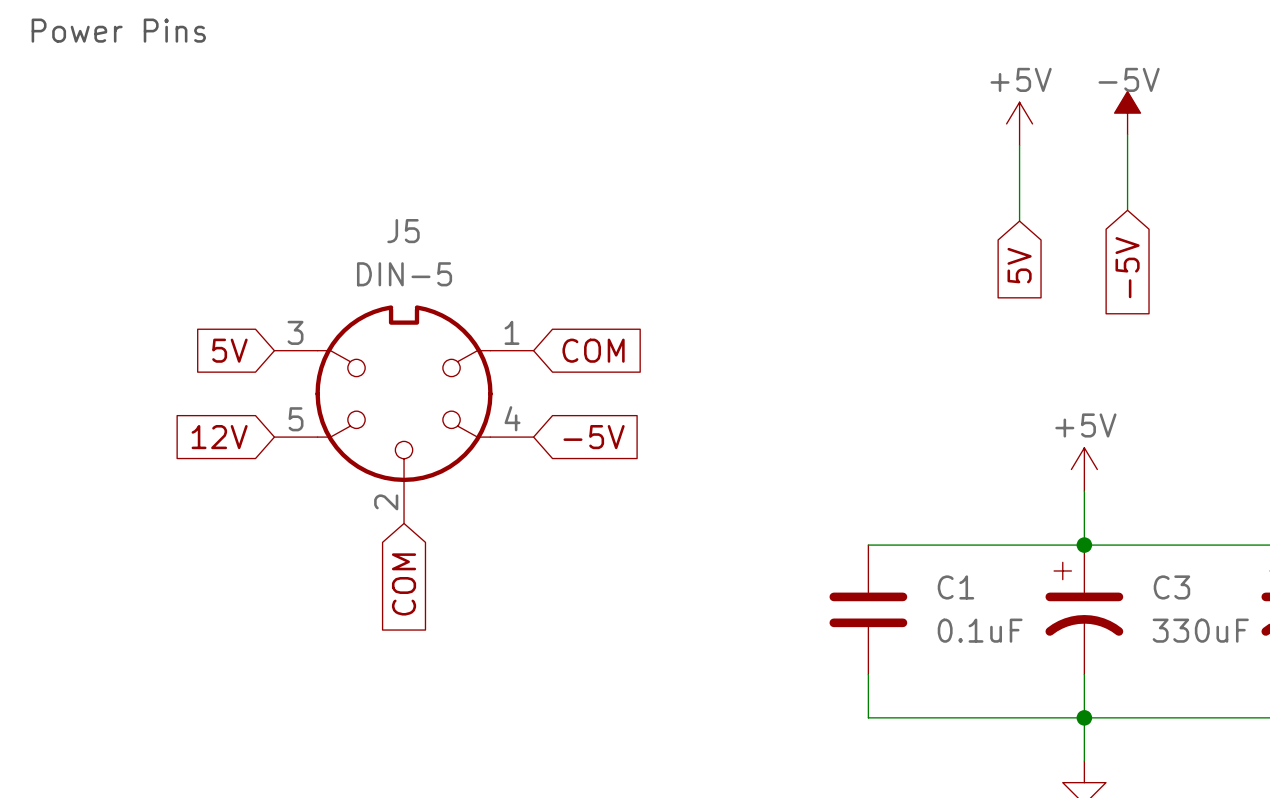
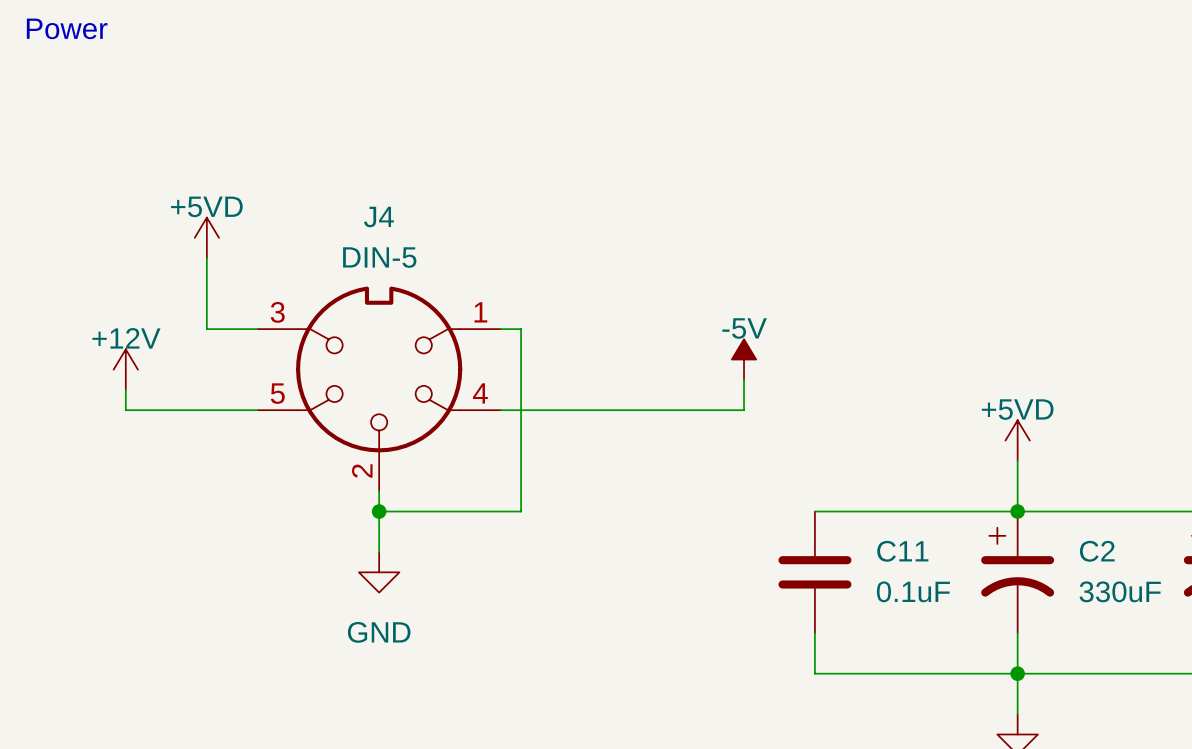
text: Power Pins (118, 30) -> Power (67, 28)
power symbol: -5V (1127, 113) -> none
power symbol: +5V (1019, 123) -> none
wire: (1127, 134) (1127, 210) -> none
wire: (1019, 145) (1019, 221) -> none
J5 name: J5 (403, 231) -> J4 (378, 217)
power symbol: none -> +5VD (206, 237)
global label: 5V (1019, 265) -> none
global label: -5V (1127, 267) -> none
wire: none -> (206, 258) (206, 329) (257, 329)
global label: 5V (229, 350) -> none
wire: none -> (500, 329) (521, 329) (521, 511) (379, 511)
global label: COM (593, 350) -> none
power symbol: none -> -5V (744, 359)
power symbol: none -> +12V (125, 369)
wire: none -> (744, 379) (744, 410) (500, 410)
wire: none -> (125, 389) (125, 410) (257, 410)
global label: 12V (219, 437) -> none
global label: -5V (594, 437) -> none
power symbol: +5V (1084, 469) -> +5VD (1017, 440)
wire: none -> (379, 491) (379, 552)
junction: none -> (379, 511)
global label: COM (404, 584) -> none
C1 name: C1 (955, 587) -> C11 (902, 551)
C3 name: C3 (1171, 587) -> C2 (1097, 551)
power symbol: none -> GND (379, 572)

